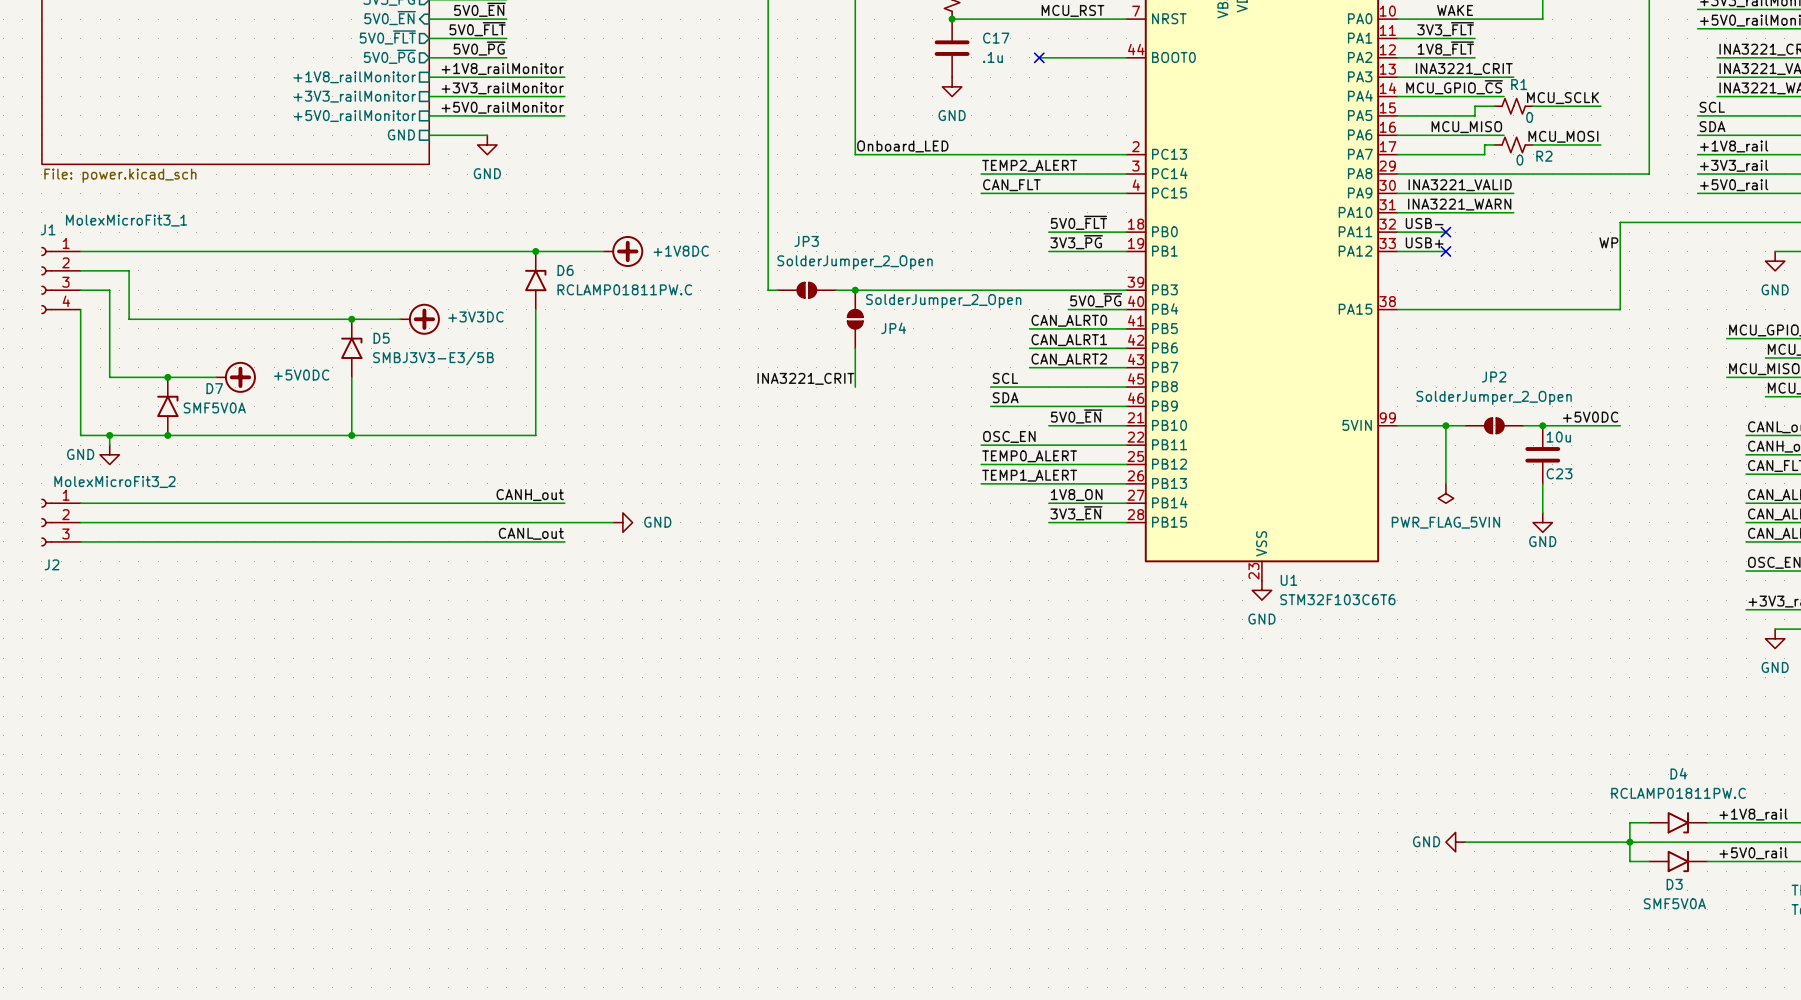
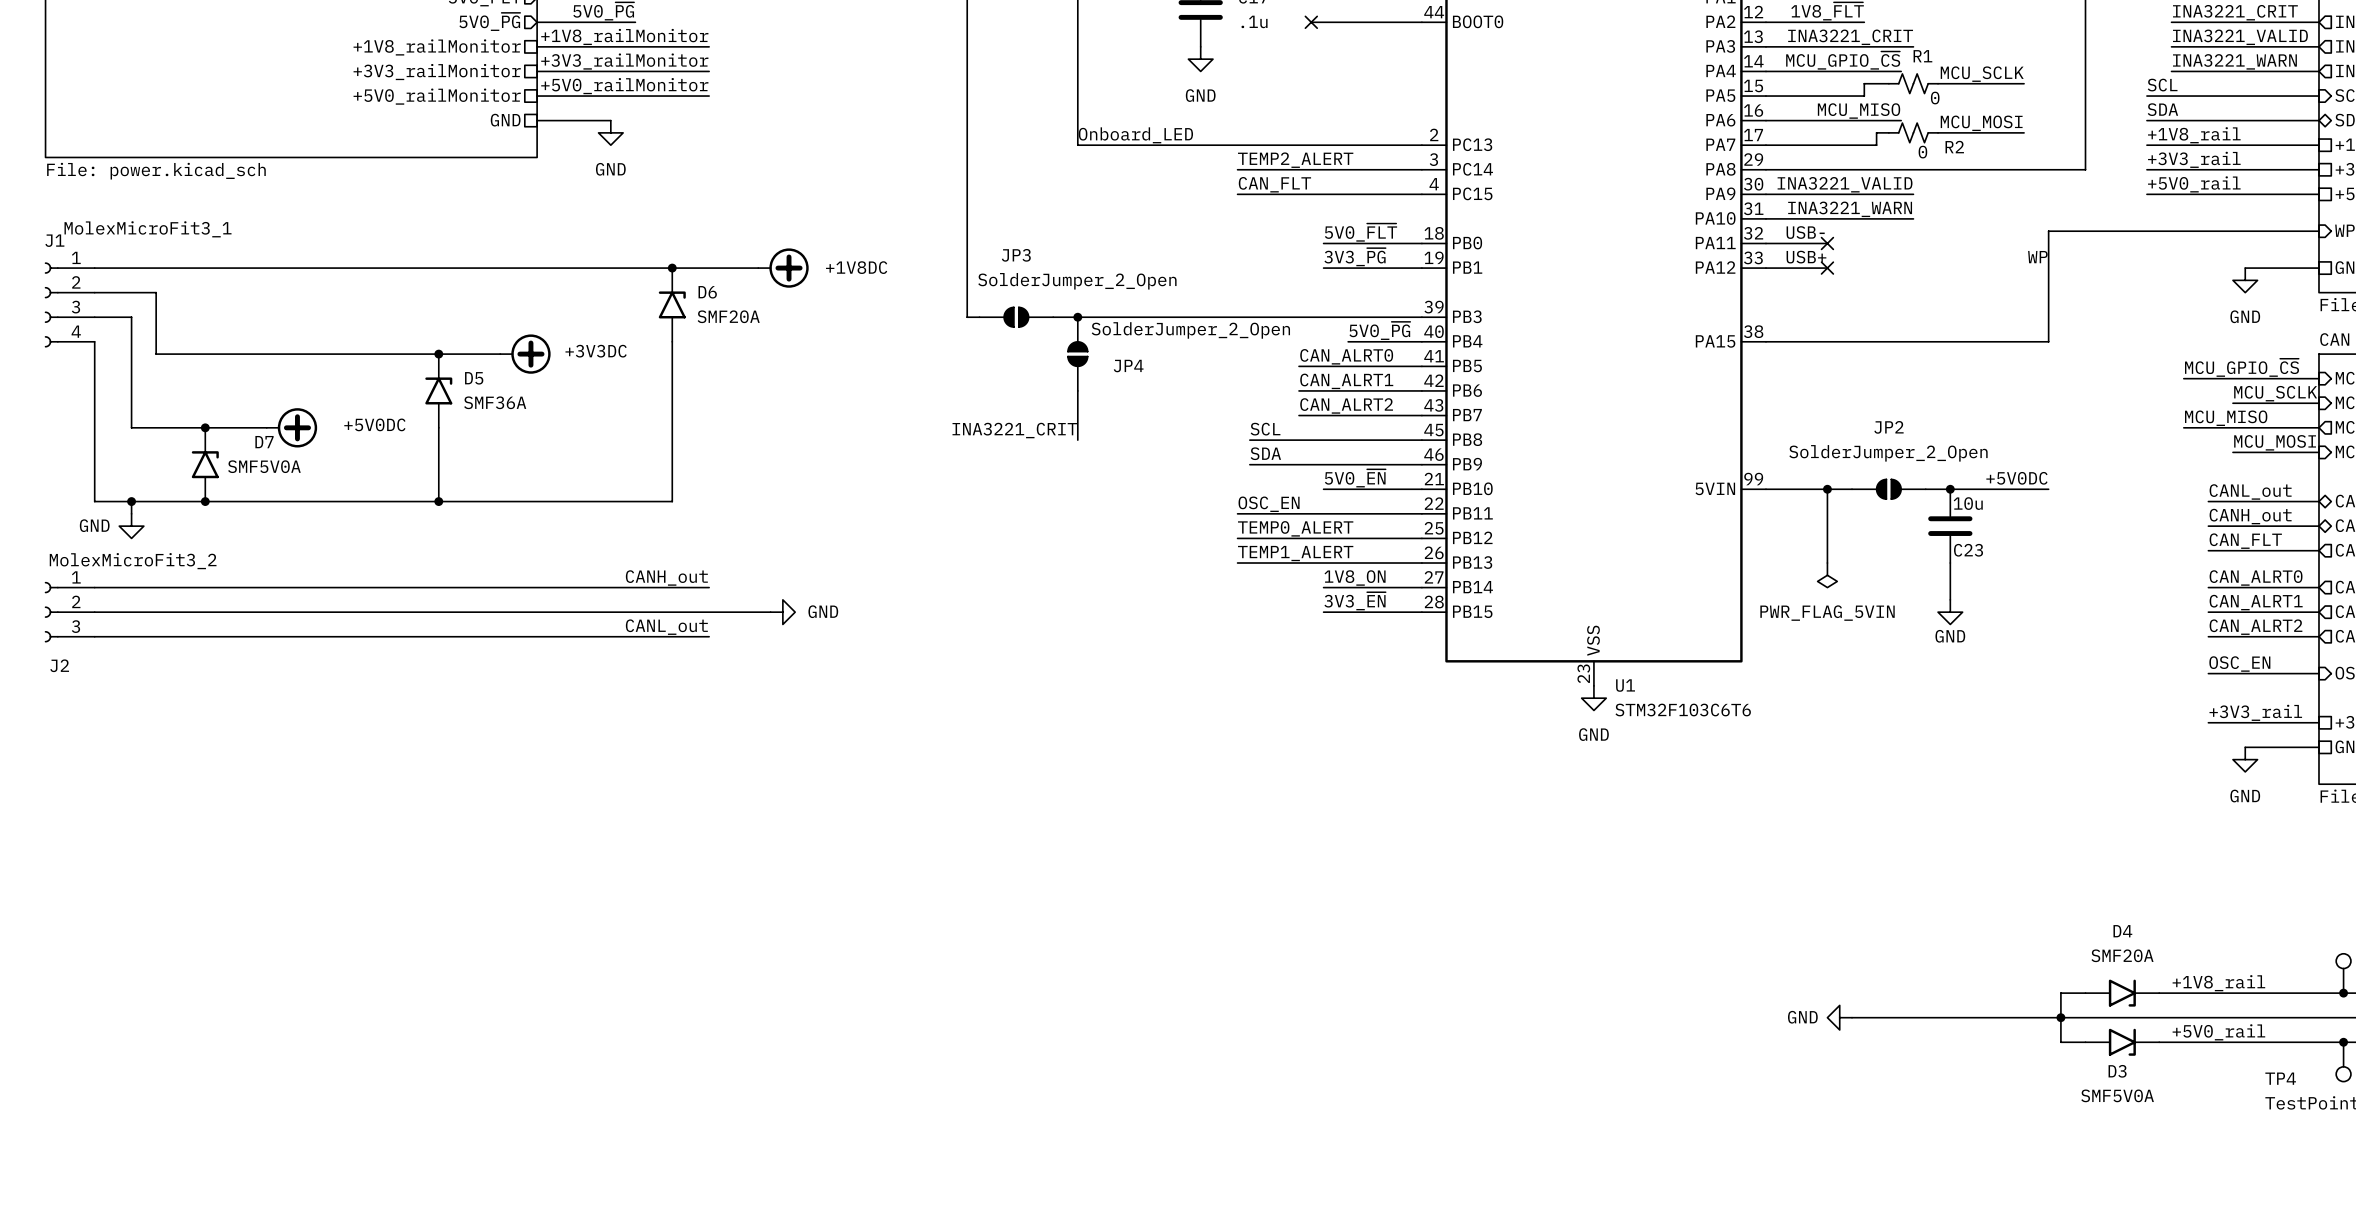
D6 value: RCLAMP01811PW.C (624, 289) -> SMF20A (728, 316)
D5 value: SMBJ3V3-E3/5B (433, 358) -> SMF36A (495, 402)
D4 value: RCLAMP01811PW.C (1678, 793) -> SMF20A (2122, 955)

